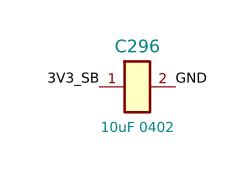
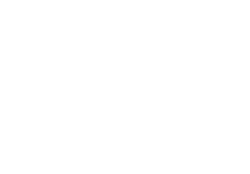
label: GND (191, 77) -> none
label: 3V3_SB (73, 79) -> none
C296: 10uF 0402 (137, 86) -> none

